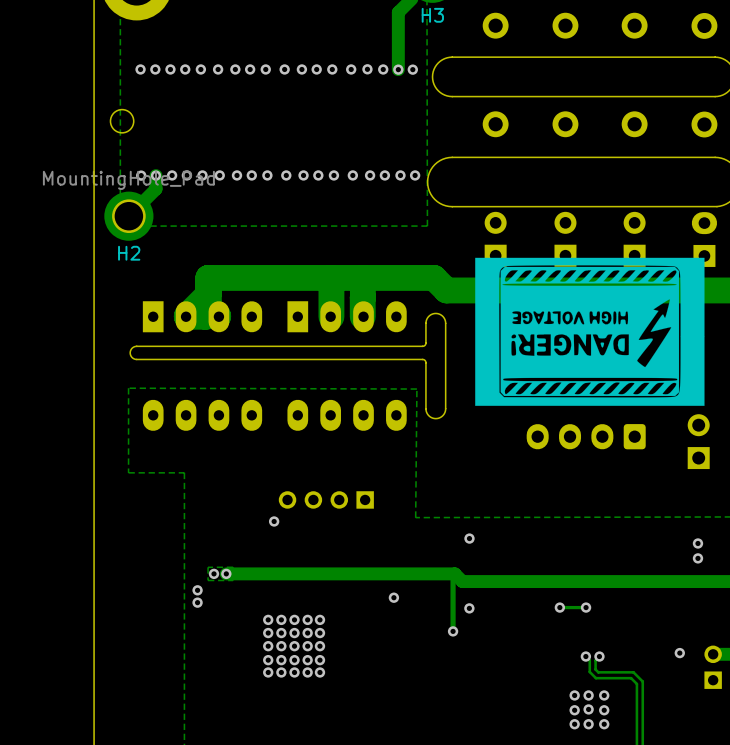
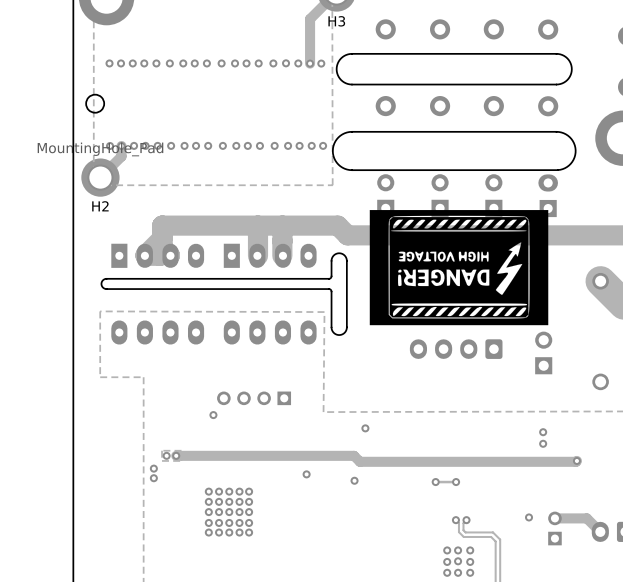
track: (454, 573) (453, 575) (453, 631) -> none
via: none -> (354, 480)
via: (469, 608) -> none
via: (453, 631) -> none

